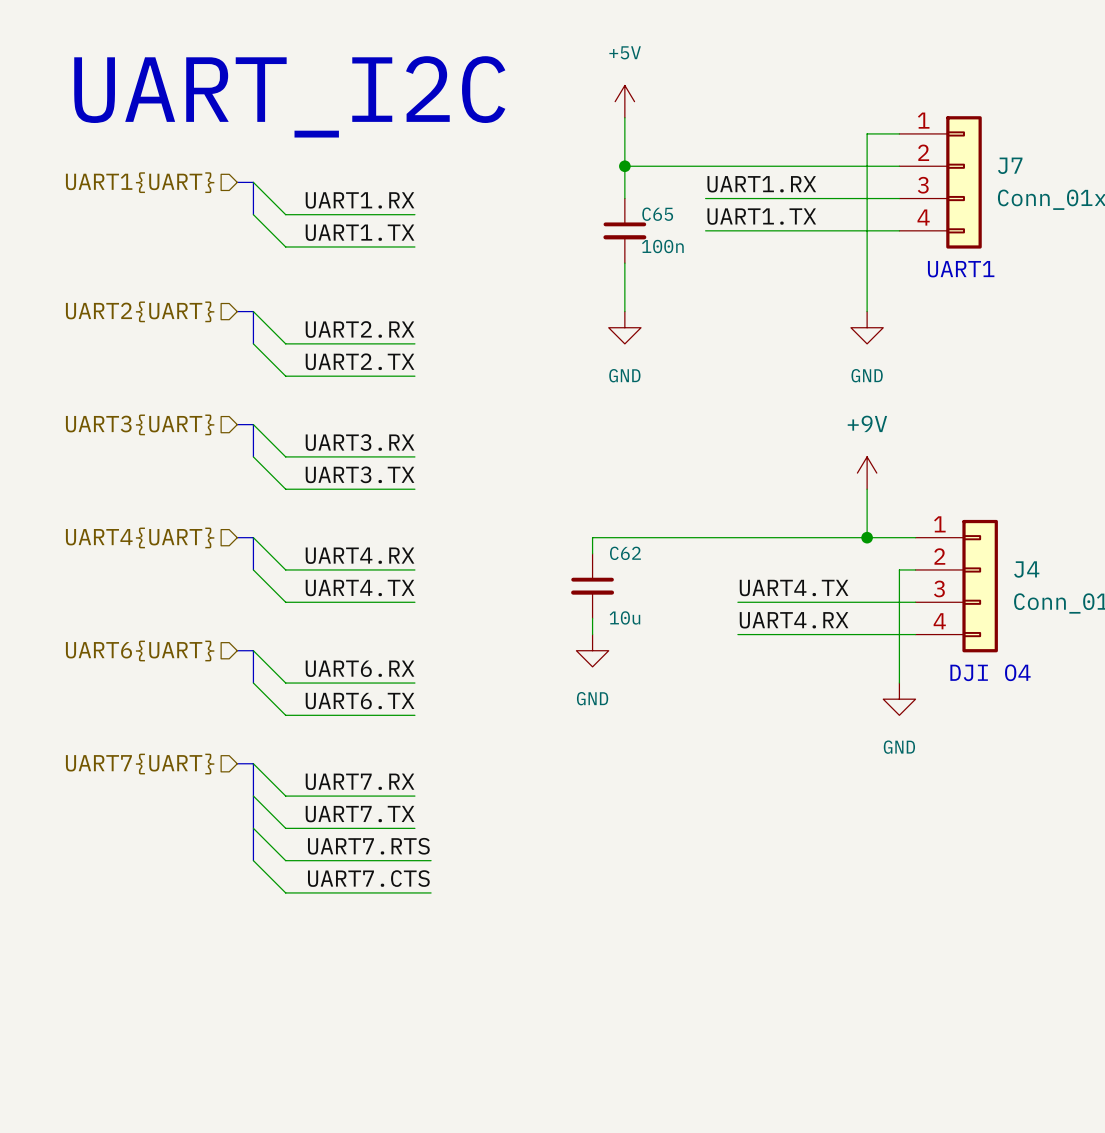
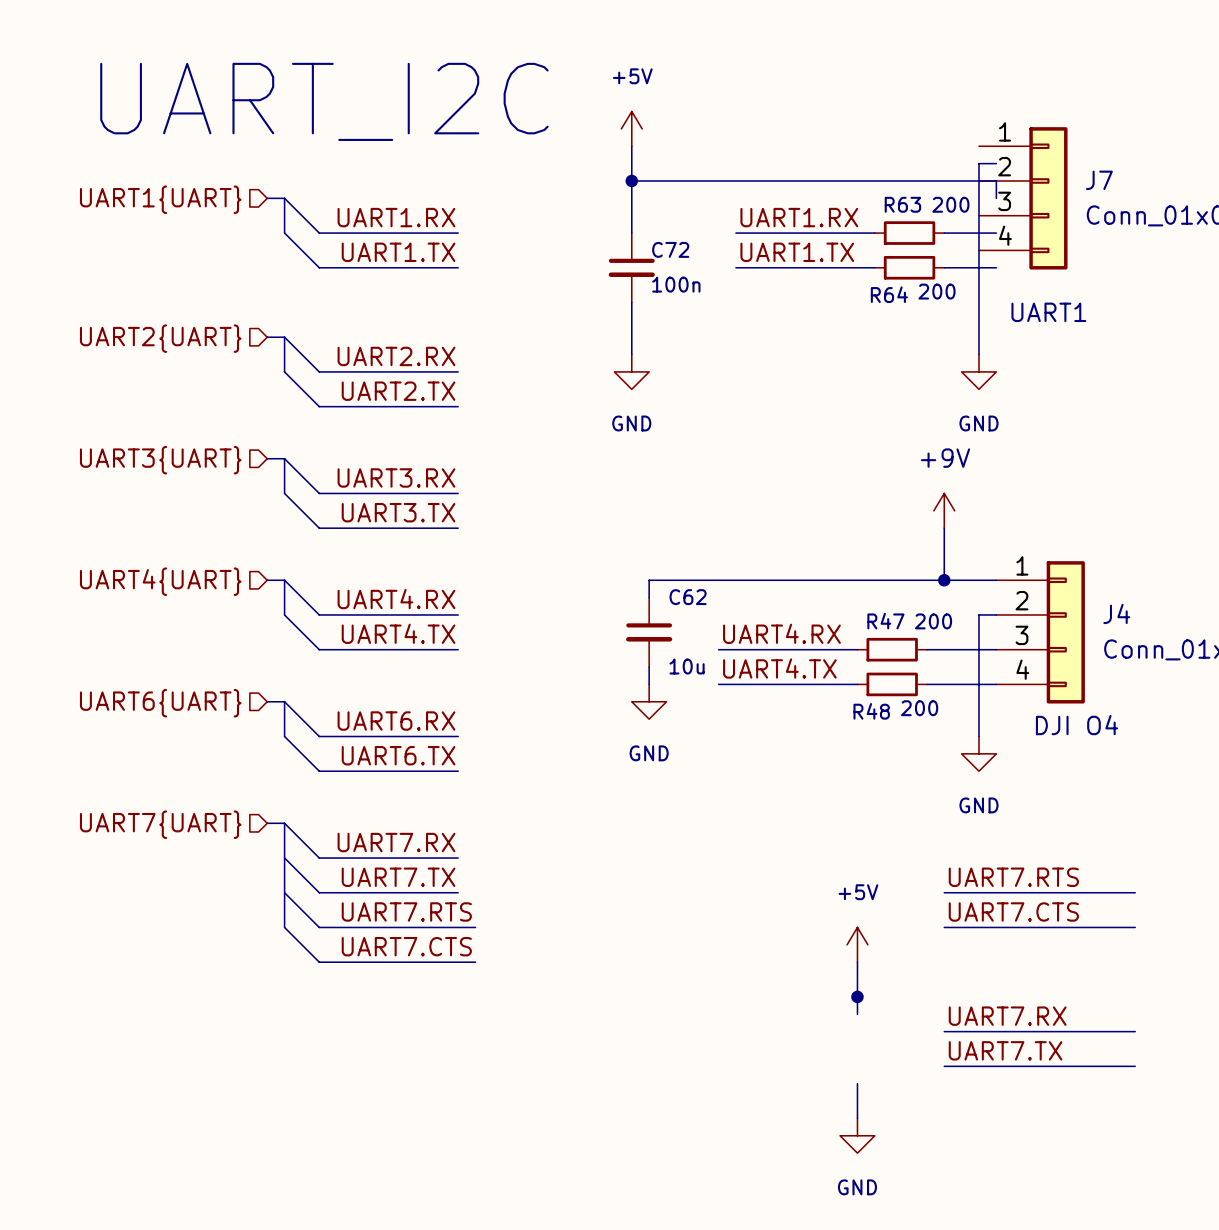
power symbol position: +5V (624, 101) -> +5V (631, 128)
wire: (624, 117) (624, 198) -> (631, 146) (631, 233)
wire: (899, 133) (867, 133) (867, 311) -> none
wire: none -> (996, 163) (978, 163) (978, 354)
wire: none -> (631, 180) (683, 180)
junction position: (624, 166) -> (631, 180)
wire: none -> (978, 180) (996, 180) (996, 198)
label position: UART1.RX (761, 184) -> UART1.RX (799, 217)
wire: (705, 198) (899, 198) -> none
wire: none -> (735, 233) (874, 233)
R63: none -> 200 (909, 233)
wire: none -> (944, 233) (996, 233)
label position: UART1.TX (761, 216) -> UART1.TX (797, 252)
C65: 100n (624, 230) -> none
wire: (705, 230) (899, 230) -> none
C72: none -> 100n (631, 267)
wire: none -> (735, 267) (874, 267)
R64: none -> 200 (909, 267)
wire: none -> (944, 267) (996, 267)
wire: (624, 263) (624, 311) -> (631, 302) (631, 354)
text position: UART1 (961, 269) -> UART1 (1048, 312)
power symbol position: GND (624, 327) -> GND (631, 371)
power symbol position: GND (867, 327) -> GND (978, 371)
label position: UART4.TX (794, 588) -> UART4.TX (779, 668)
wire: none -> (718, 649) (805, 649)
wire: (786, 602) (850, 602) -> none
R47: none -> 200 (892, 649)
label position: UART4.RX (794, 620) -> UART4.RX (781, 633)
wire: none -> (718, 684) (805, 684)
wire: (786, 634) (850, 634) -> none
R48: none -> 200 (892, 684)
label: none -> UART7.RTS (1013, 877)
wire: none -> (944, 892) (1135, 892)
label: none -> UART7.CTS (1013, 911)
wire: none -> (944, 927) (1135, 927)
power symbol: none -> +5V (857, 944)
wire: none -> (857, 962) (857, 1014)
junction: none -> (857, 996)
label: none -> UART7.RX (1007, 1016)
wire: none -> (944, 1031) (1135, 1031)
label: none -> UART7.TX (1005, 1050)
wire: none -> (944, 1066) (1135, 1066)
wire: none -> (857, 1083) (857, 1118)
power symbol: none -> GND (857, 1135)

